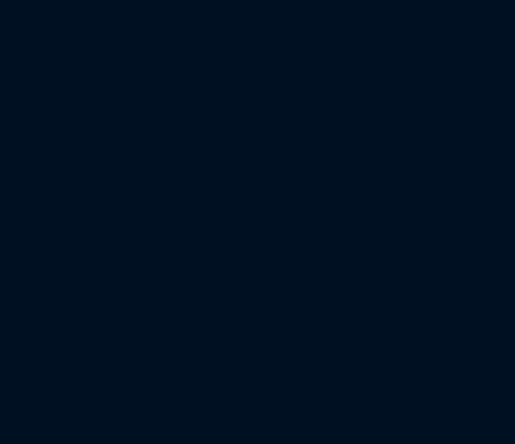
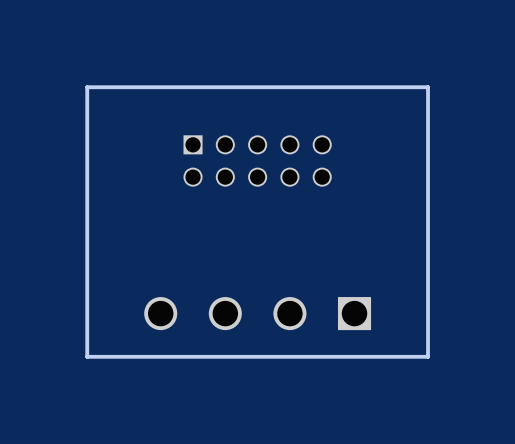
board edge: none -> (428, 87) (428, 356) (87, 356) (87, 87) (428, 87)
part: none -> (257, 160)
part: none -> (257, 313)

